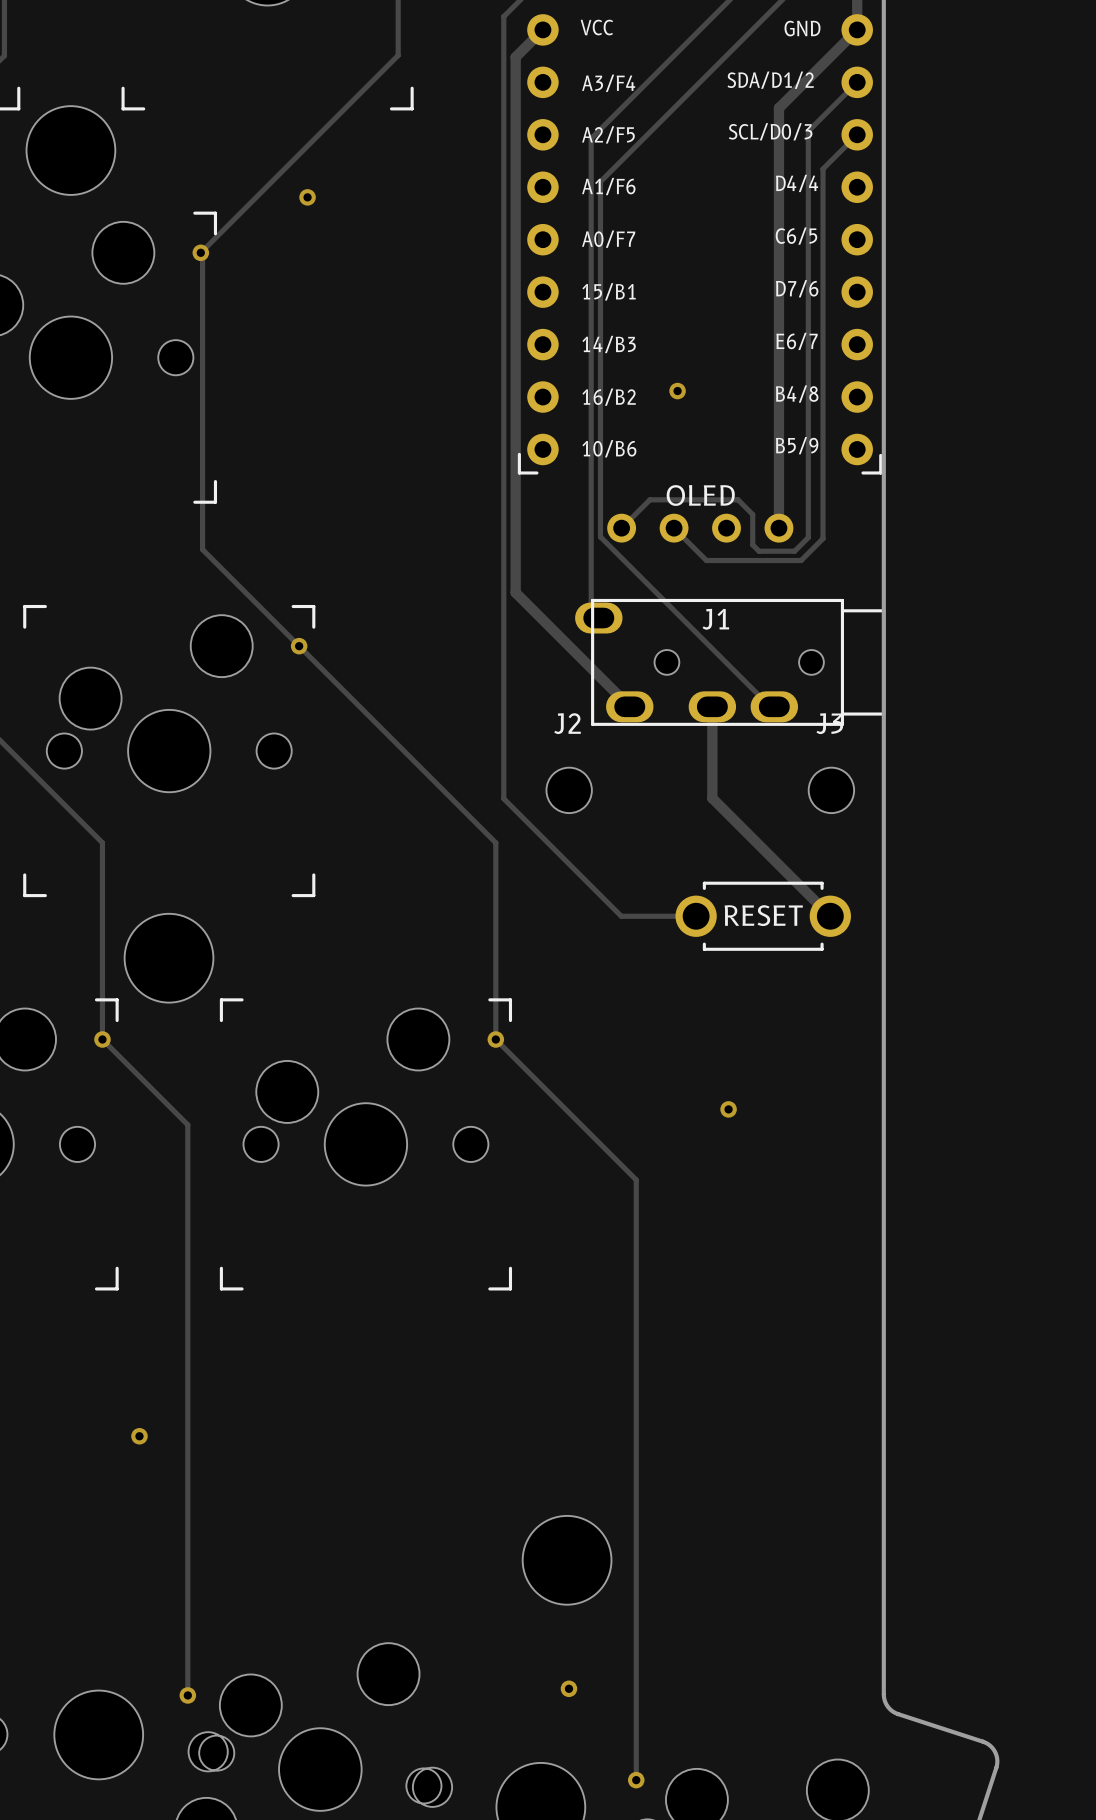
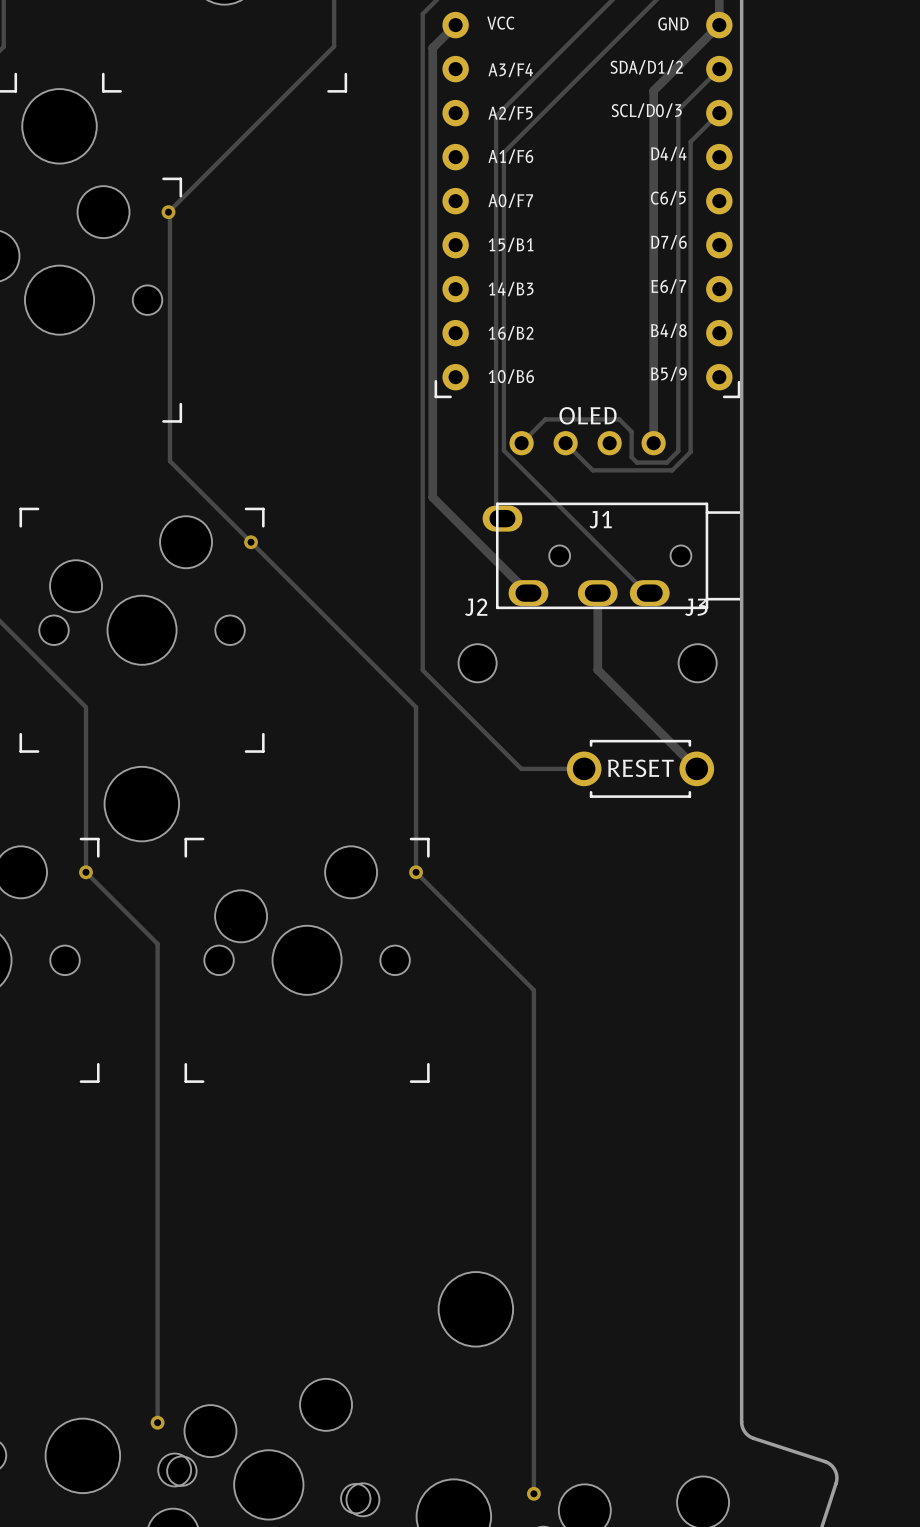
via: (307, 197) -> none
via: (677, 391) -> none
via: (728, 1109) -> none
via: (139, 1436) -> none
via: (568, 1688) -> none

